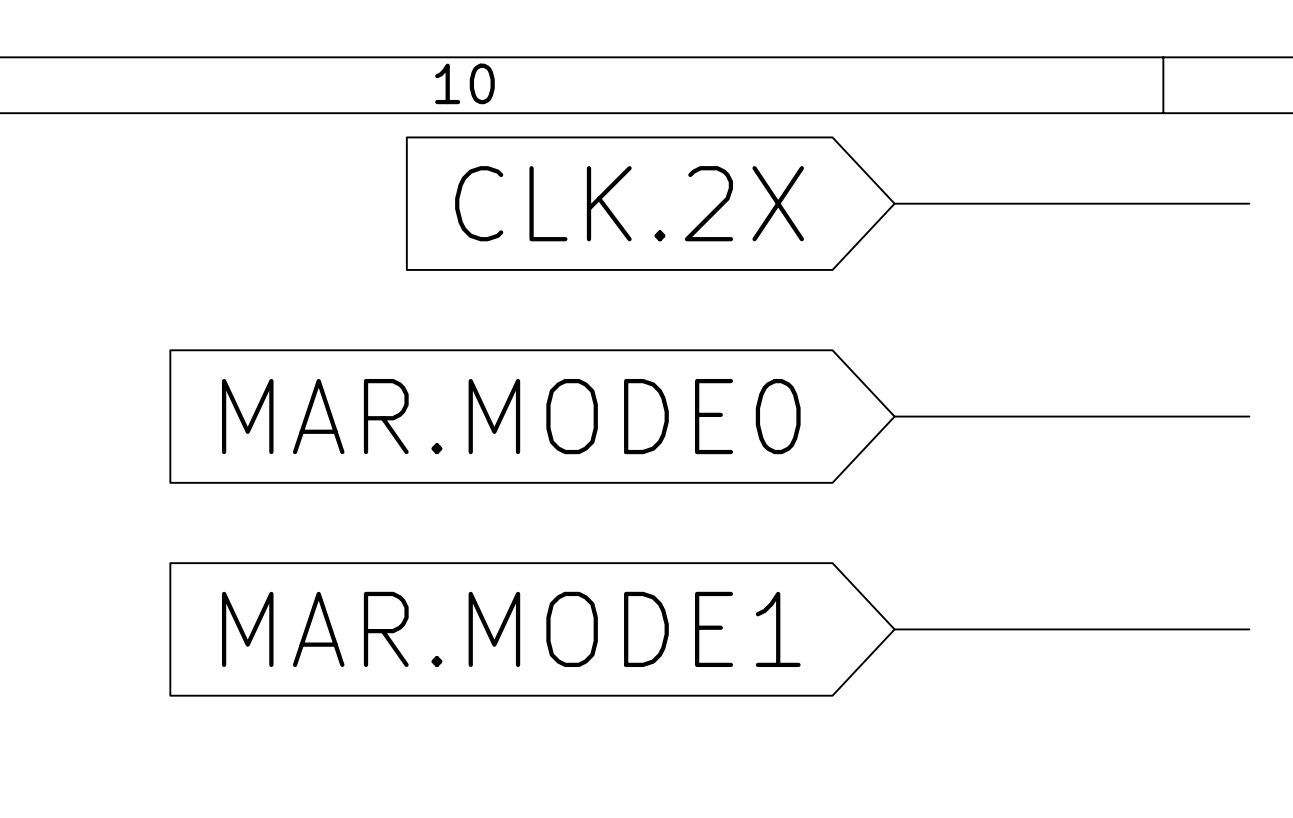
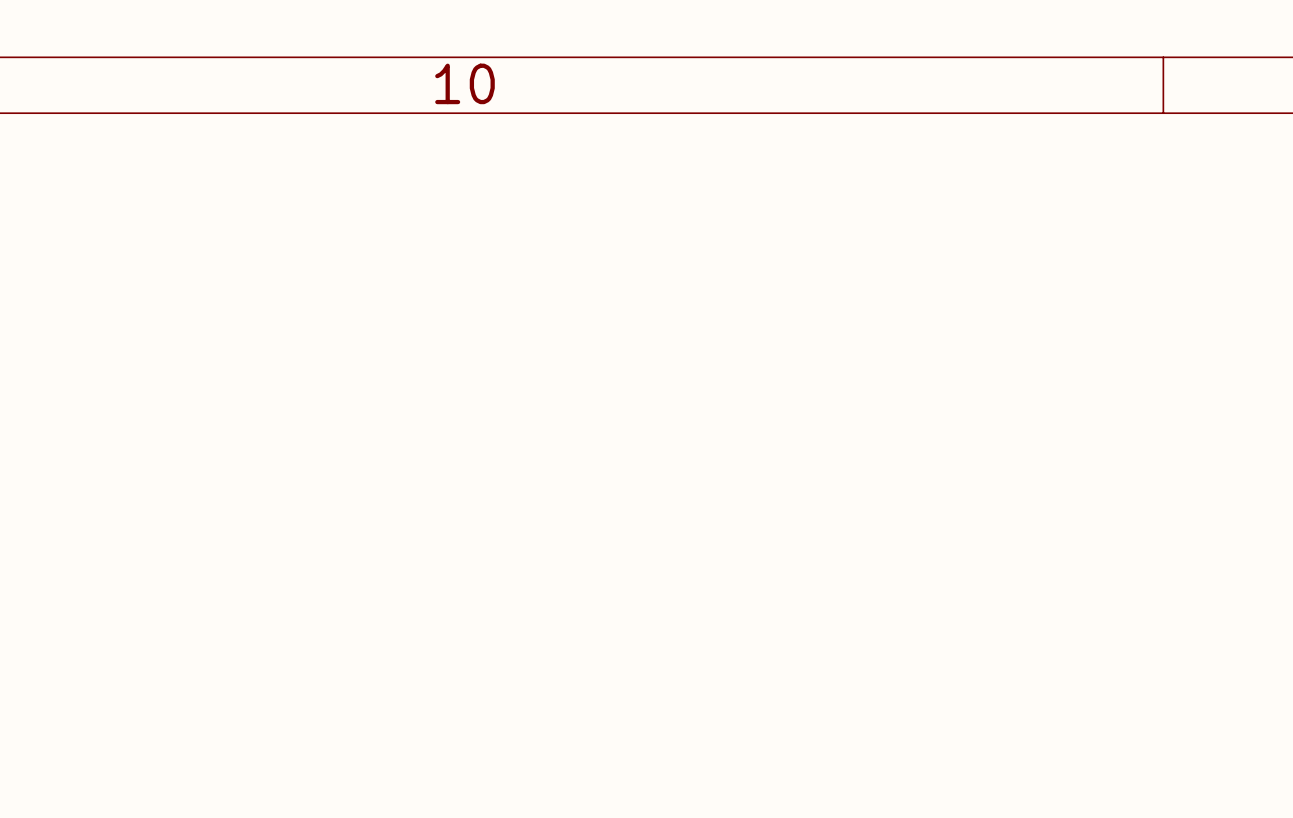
global label: CLK.2X (629, 203) -> none
wire: (894, 203) (1249, 203) -> none
global label: MAR.MODE0 (511, 416) -> none
wire: (894, 416) (1249, 416) -> none
global label: MAR.MODE1 (511, 629) -> none
wire: (894, 629) (1249, 629) -> none

